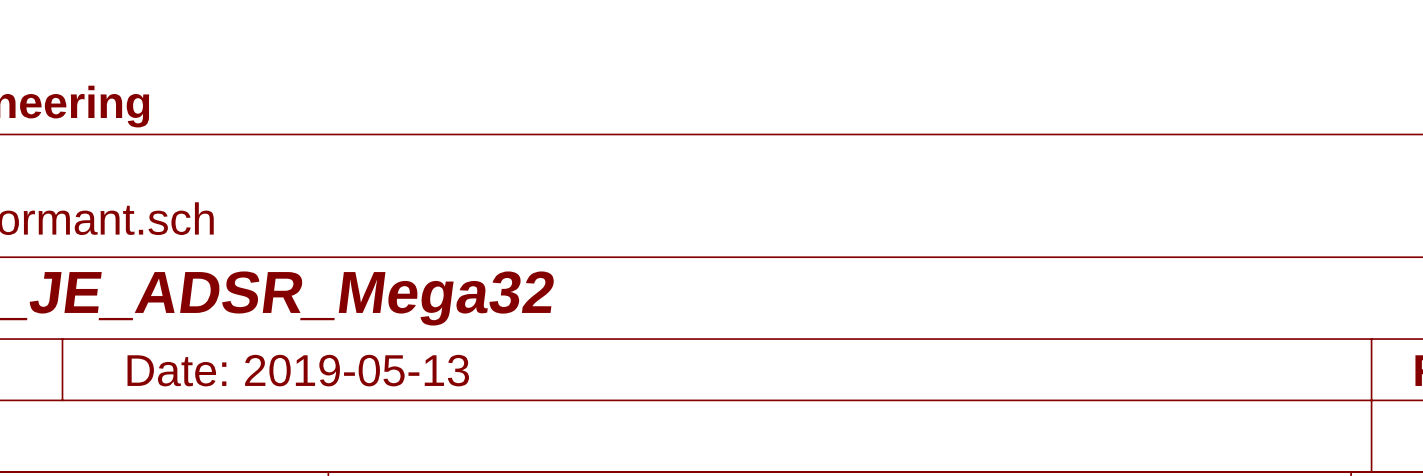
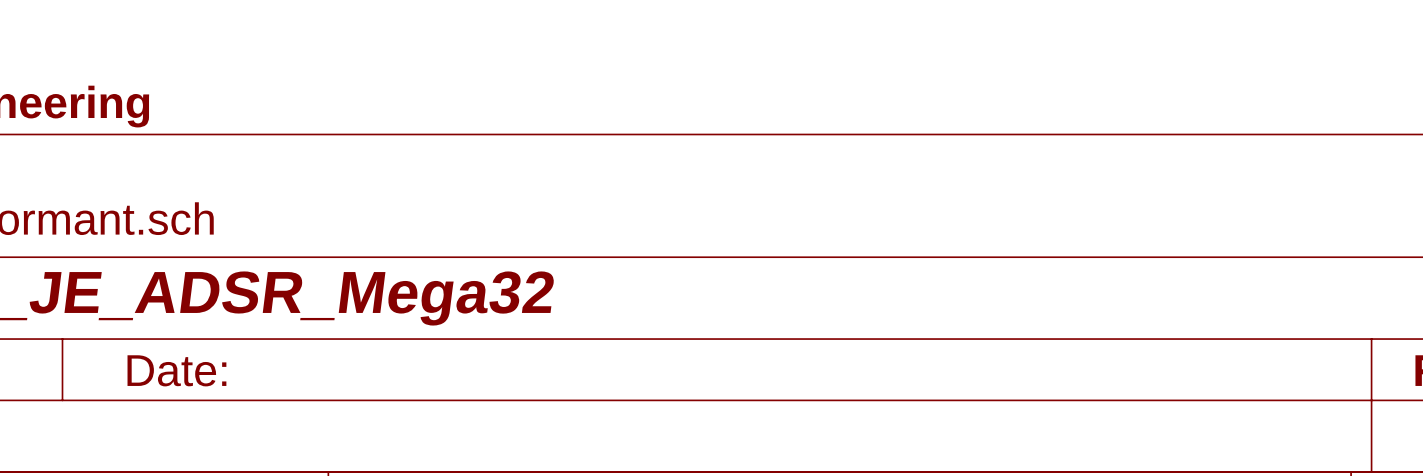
title block: Date: 2019-05-13 (298, 370) -> Date: (176, 370)

